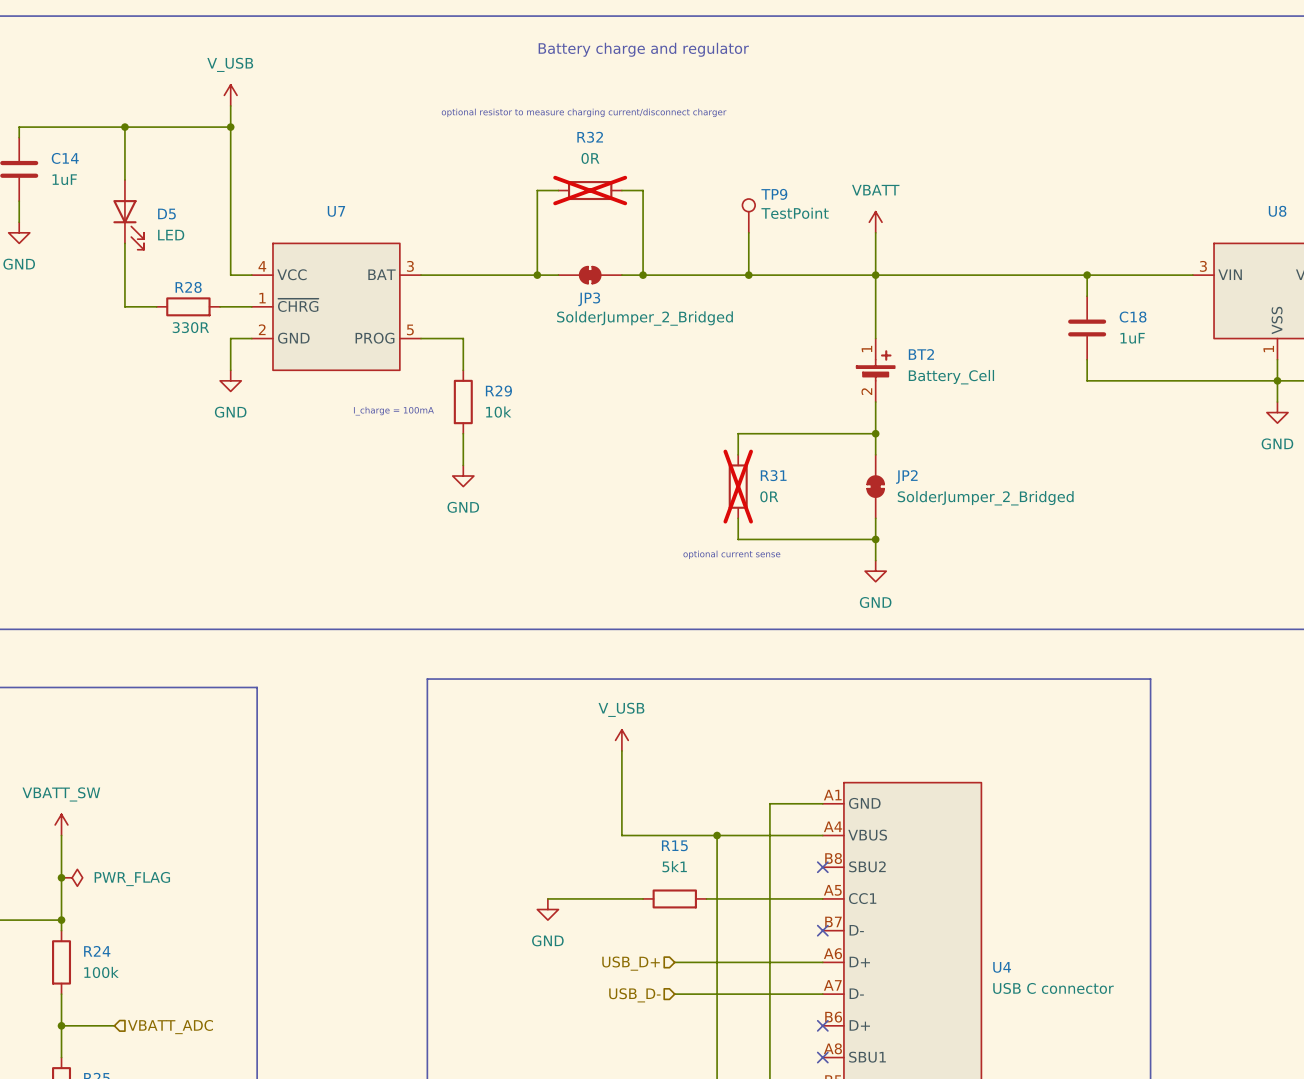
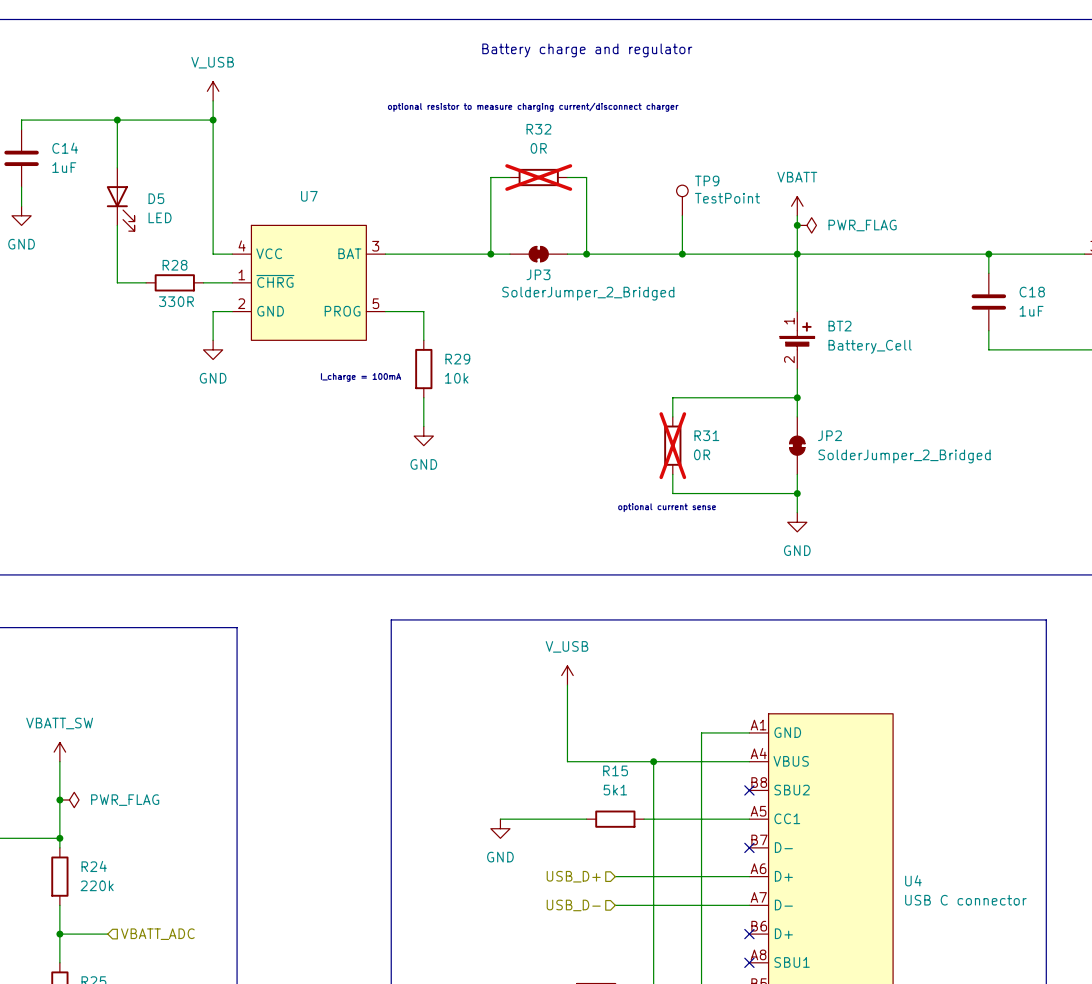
junction: none -> (797, 225)
power symbol: none -> PWR_FLAG (806, 225)
R24 value: 100k (101, 972) -> 220k (97, 885)

